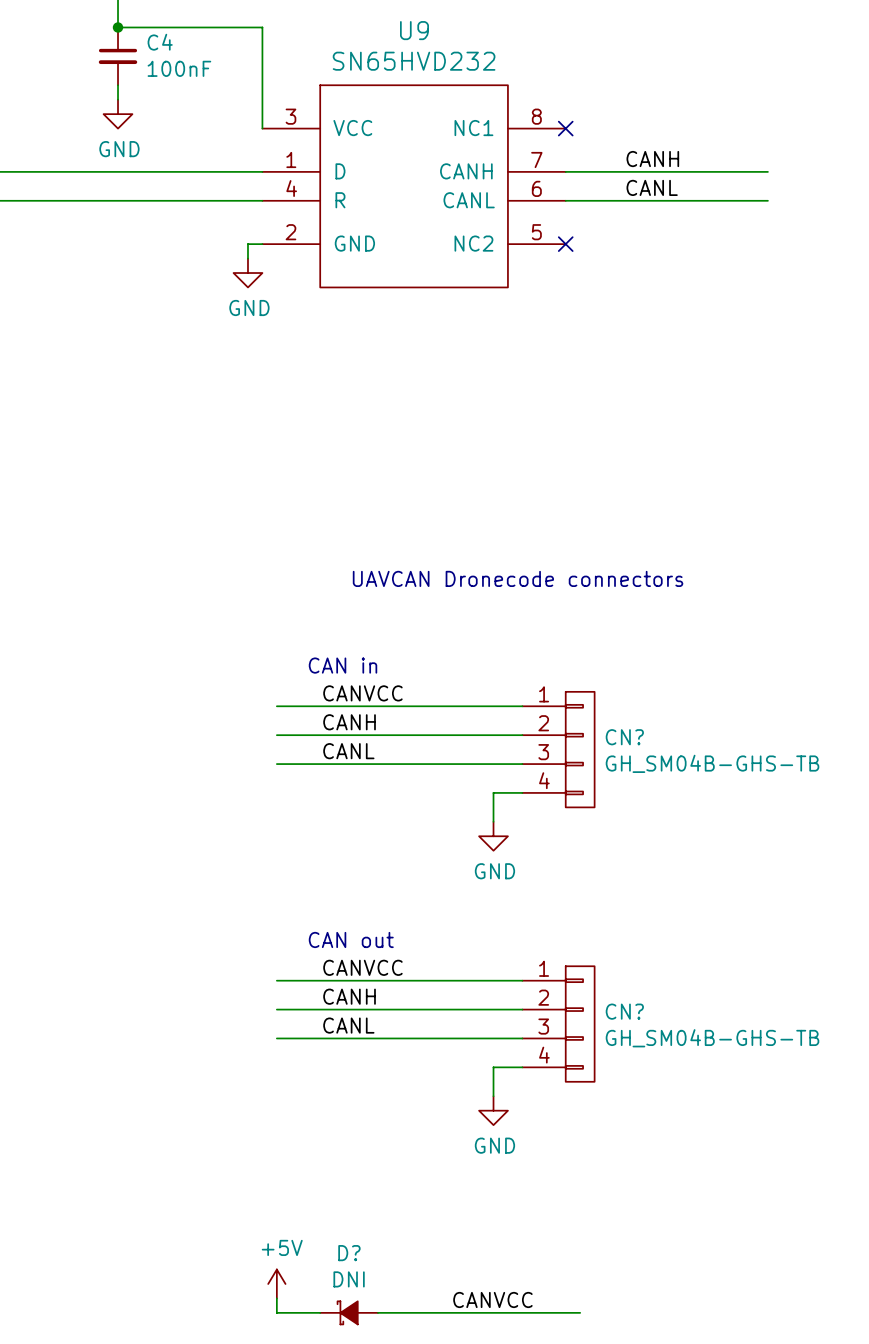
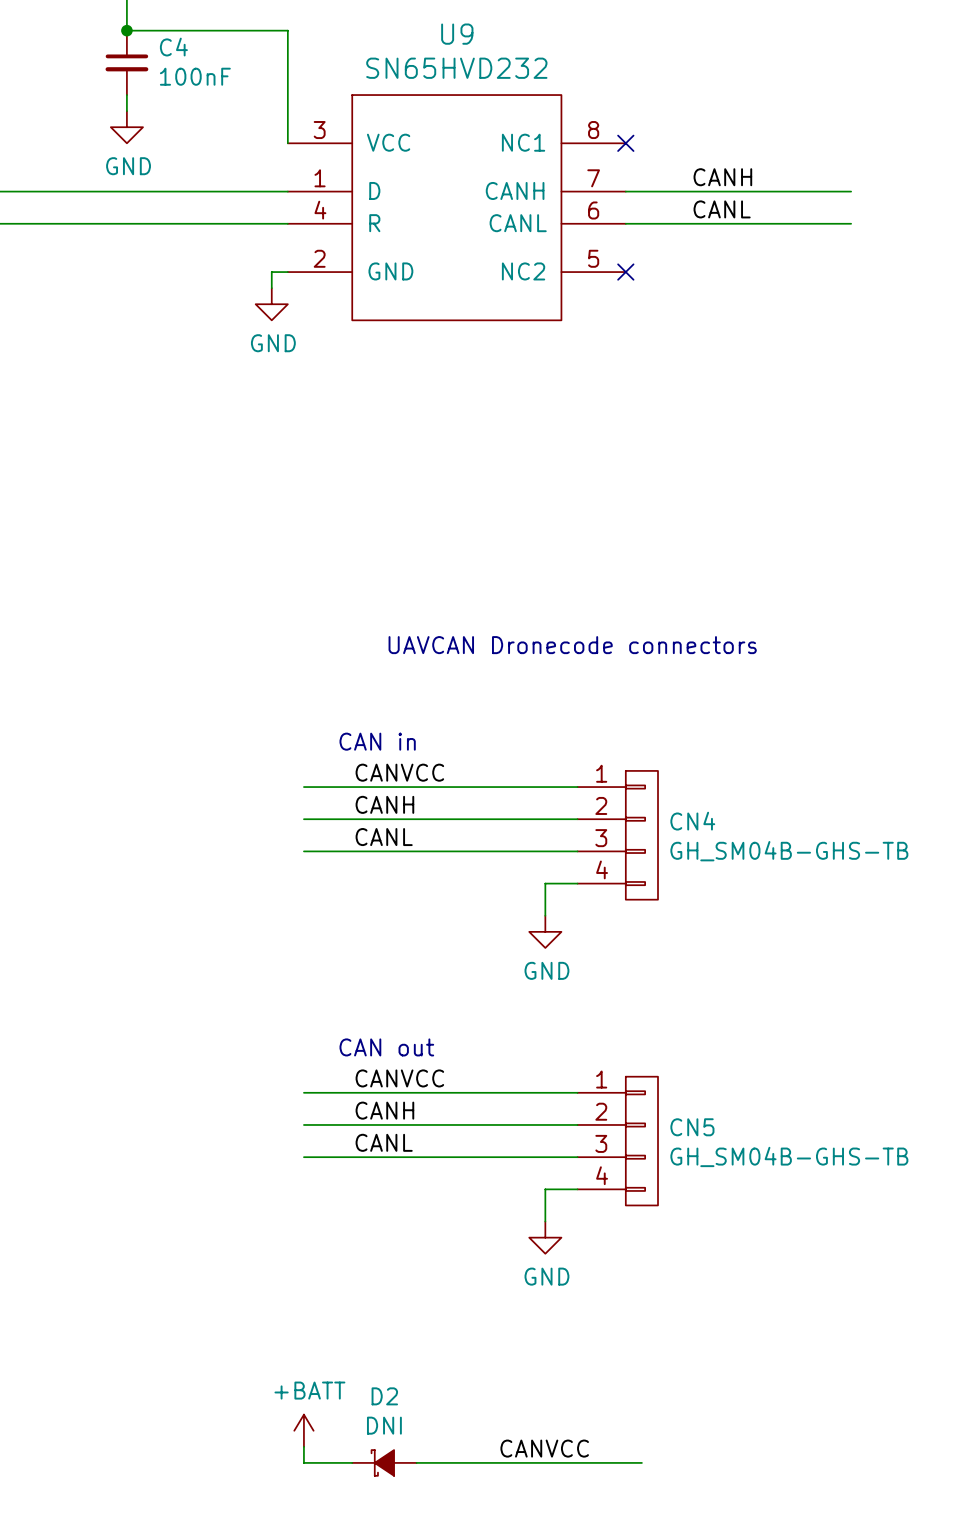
CN? name: CN? (624, 737) -> CN4 (692, 821)
CN? name: CN? (624, 1011) -> CN5 (692, 1127)
D? name: D? (349, 1253) -> D2 (384, 1396)
power symbol: +5V (276, 1283) -> +BATT (303, 1430)

